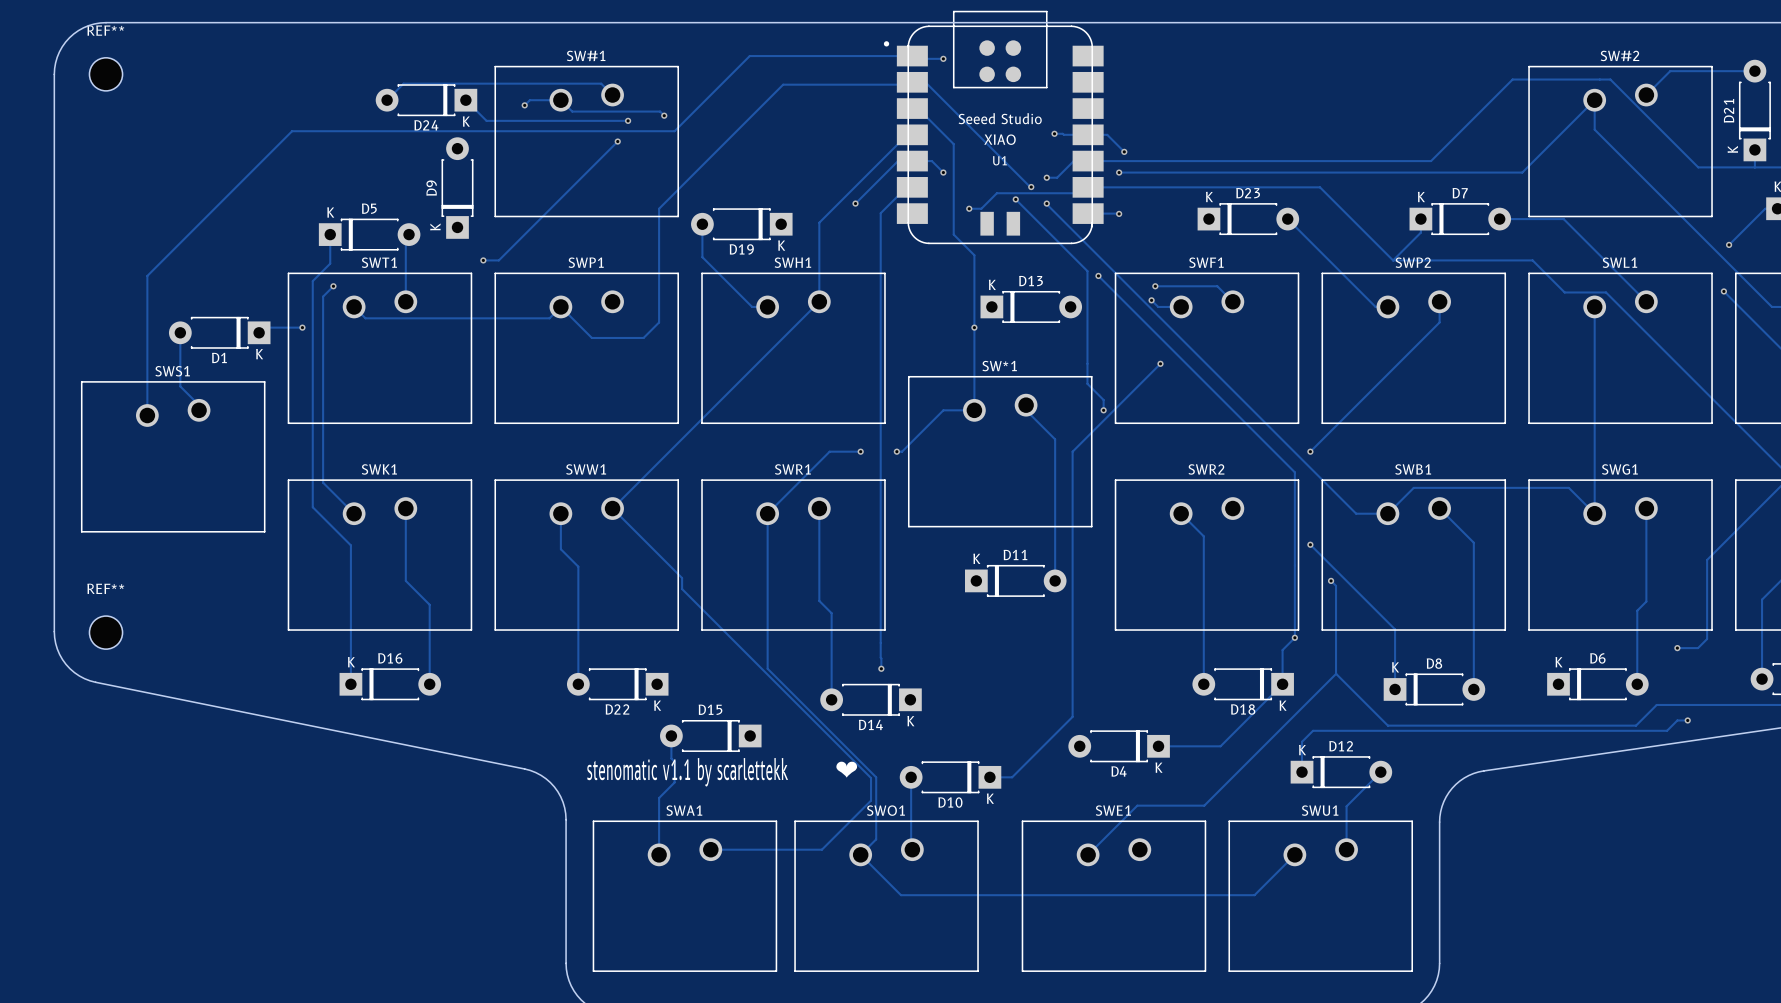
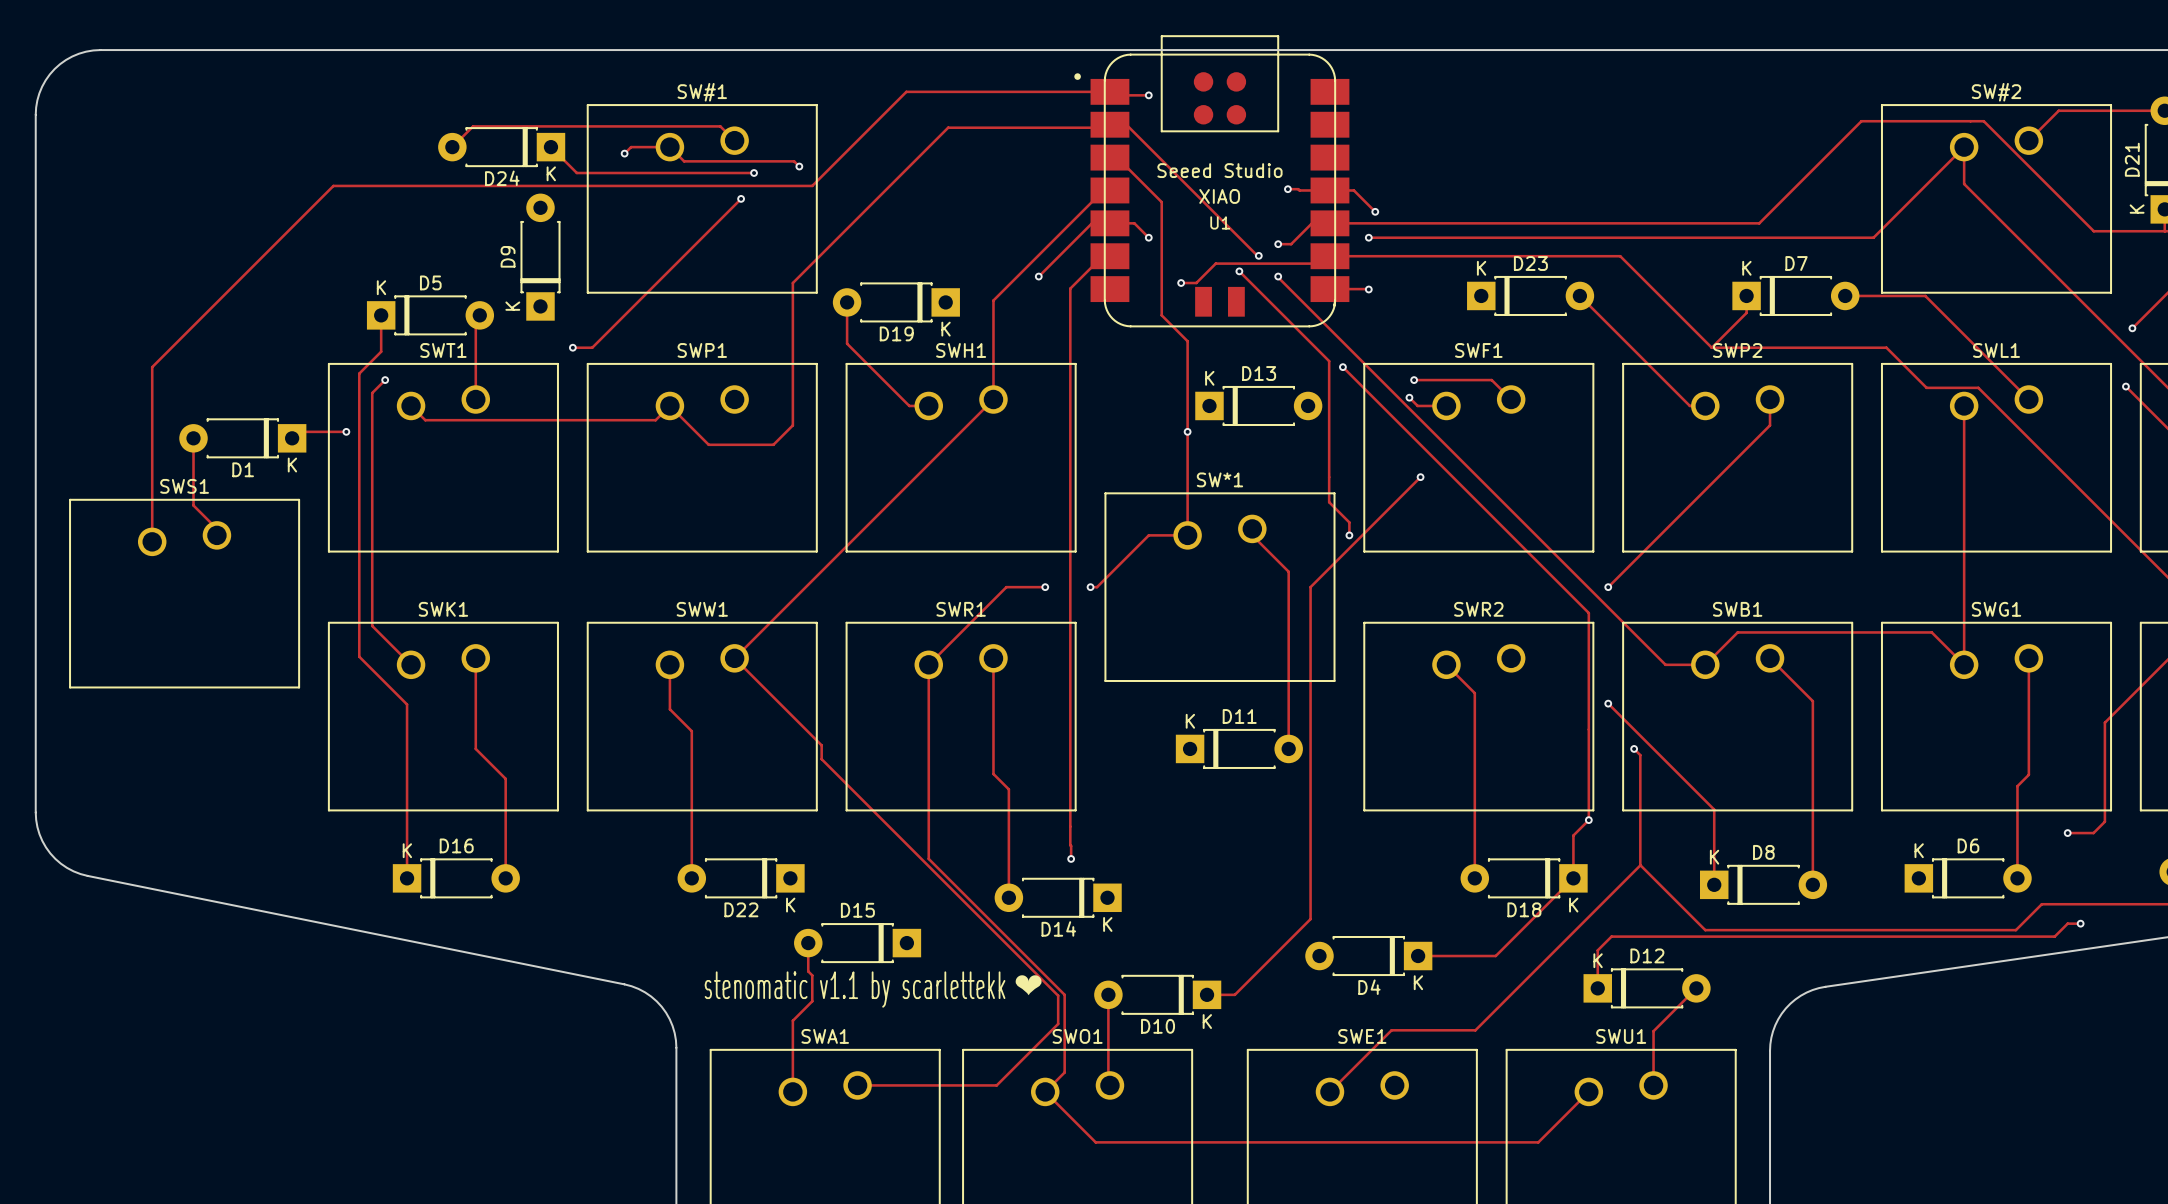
REF**: (106, 74) -> none
REF**: (106, 632) -> none

